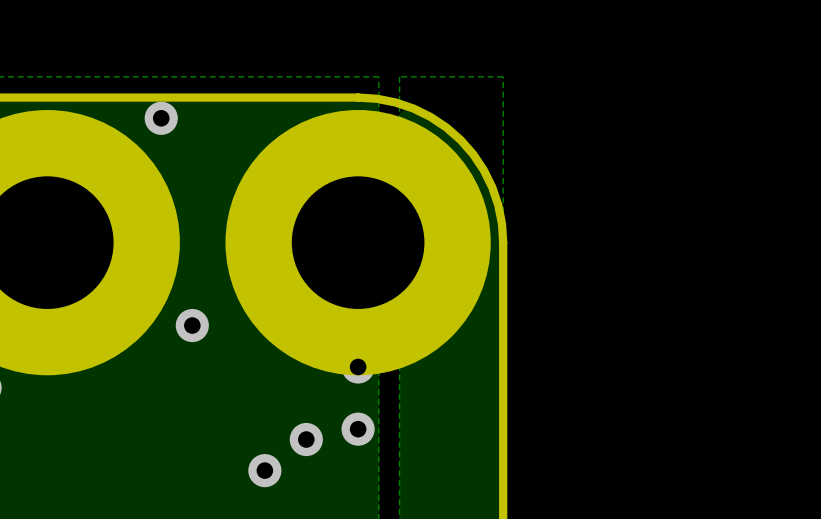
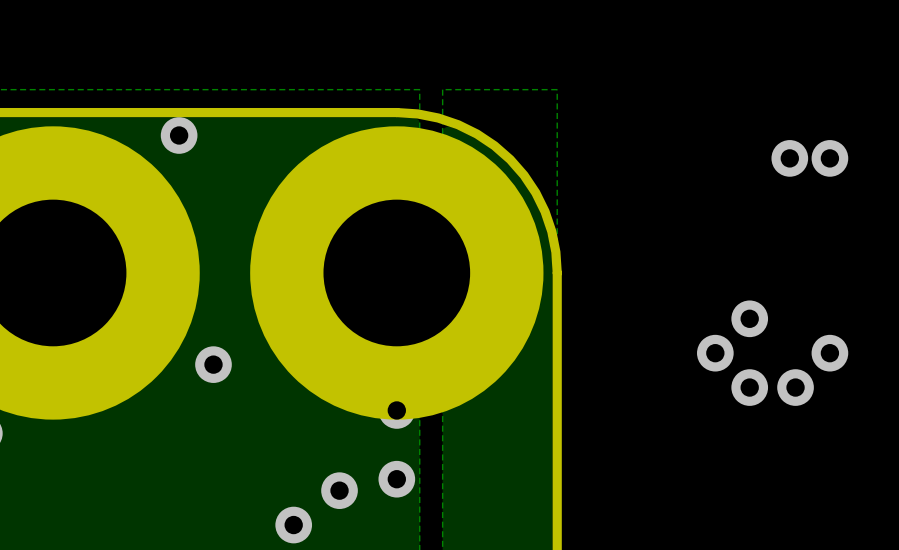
via: none -> (789, 158)
via: none -> (829, 158)
via: none -> (749, 318)
via: none -> (715, 353)
via: none -> (829, 353)
via: none -> (749, 387)
via: none -> (795, 387)

